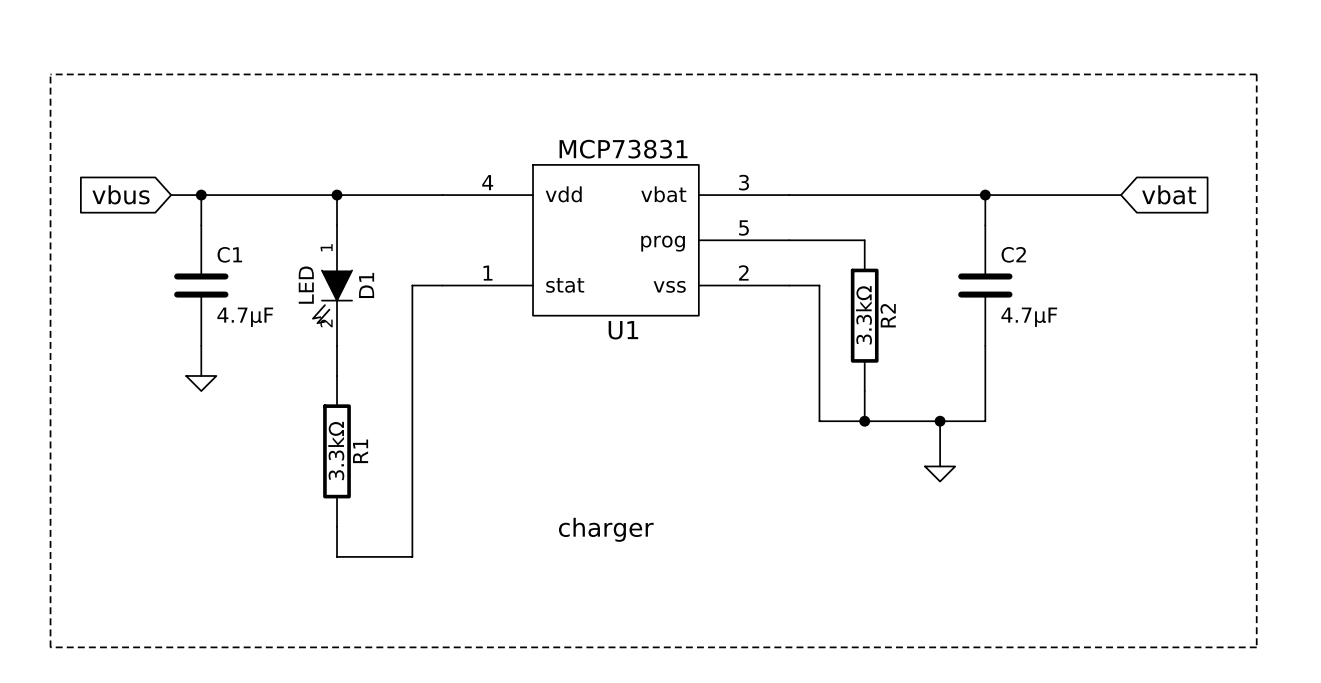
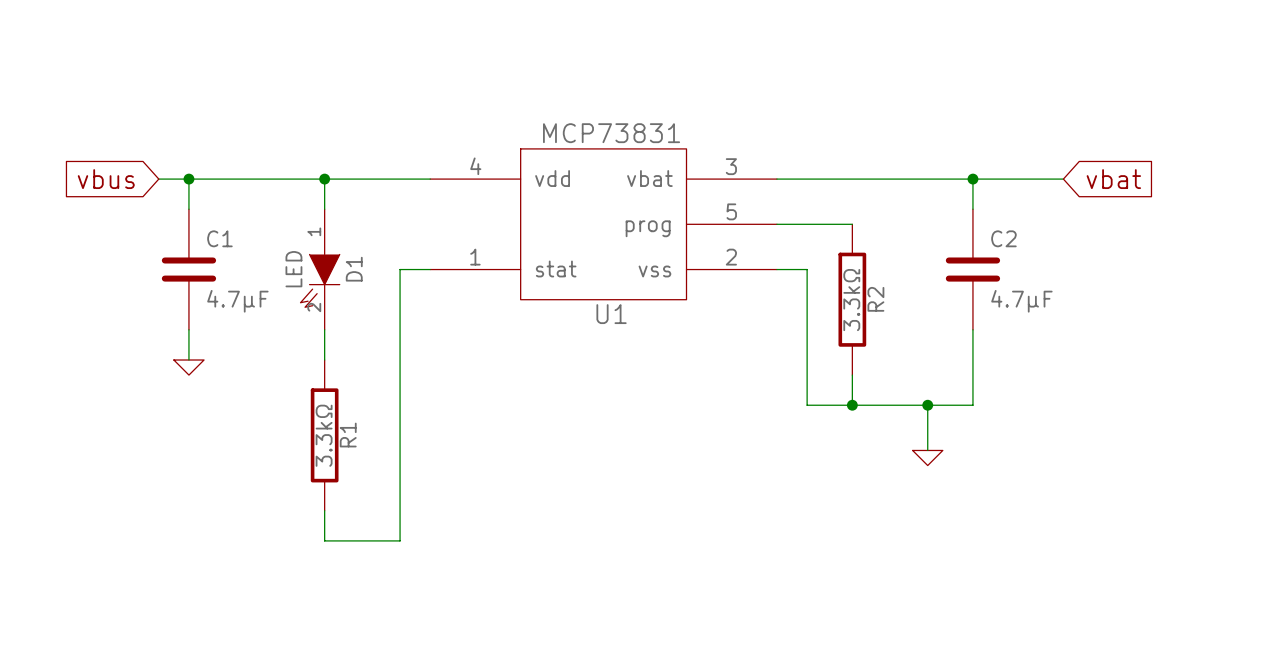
line: (50, 74) (1256, 74) (1256, 647) (50, 647) (50, 74) -> none
global label position: vbat (1169, 194) -> vbat (1113, 179)
wire: (1075, 195) (1121, 195) -> none
text: charger (606, 529) -> none

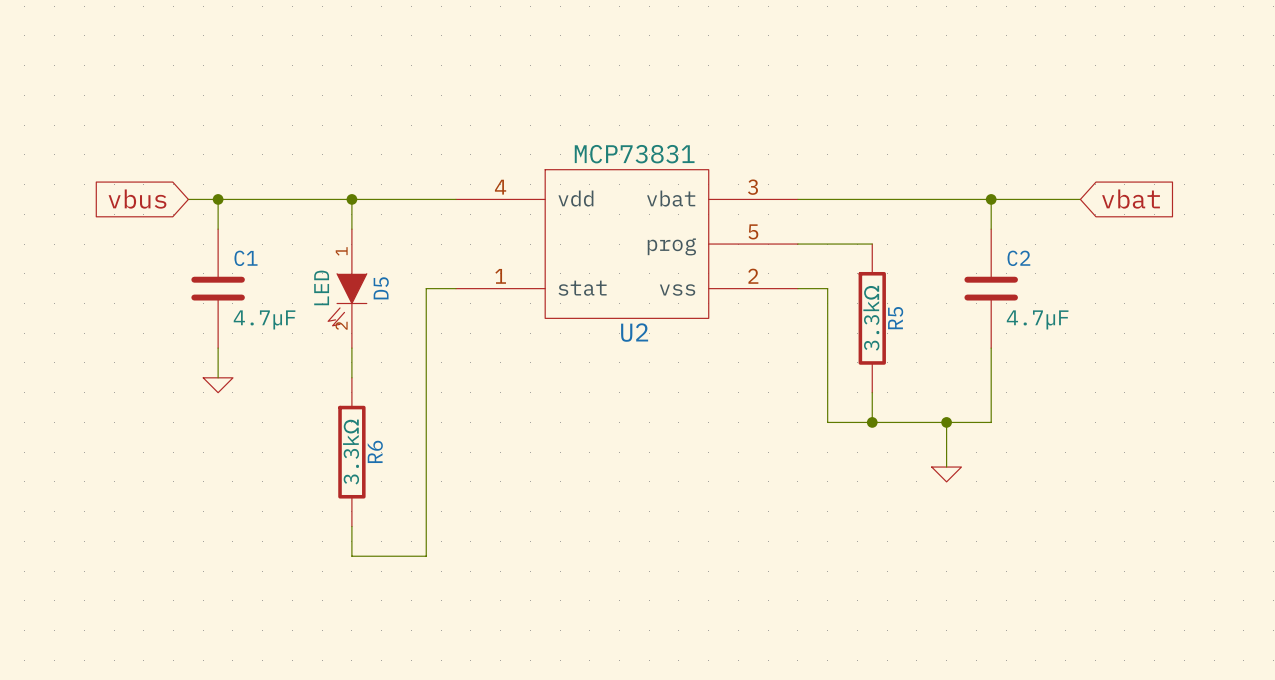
D1 name: D1 (354, 269) -> D5 (381, 288)
R2 name: R2 (875, 299) -> R5 (895, 318)
U1 name: U1 (611, 314) -> U2 (634, 332)
R1 name: R1 (348, 435) -> R6 (375, 451)

